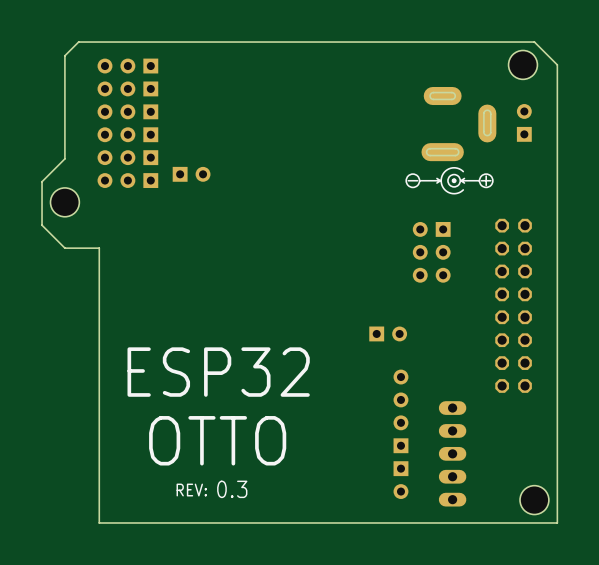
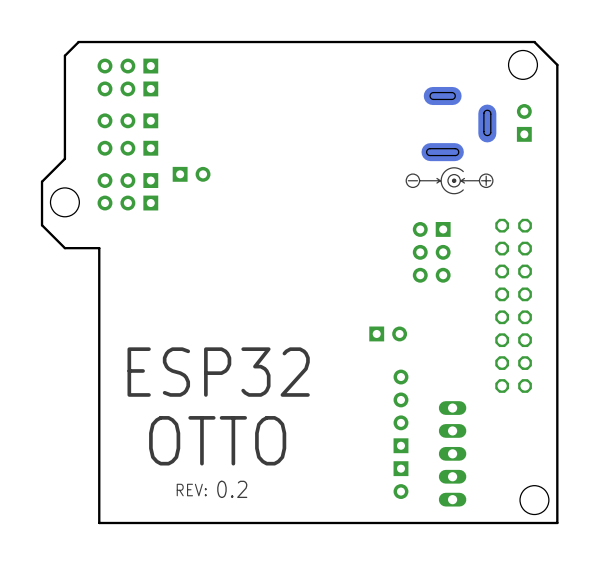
board edge: none -> (534, 42) (78, 42) (64, 55) (64, 158) (42, 181) (42, 225) (64, 248) (99, 248) (99, 522) (557, 522) (557, 64) (534, 42)
part: (127, 111) -> none
part: none -> (127, 120)
part: (127, 134) -> none
part: none -> (127, 148)
part: (127, 157) -> none
part: none -> (127, 203)
drawing shape: [176, 480, 248, 499] -> [176, 480, 248, 499]

